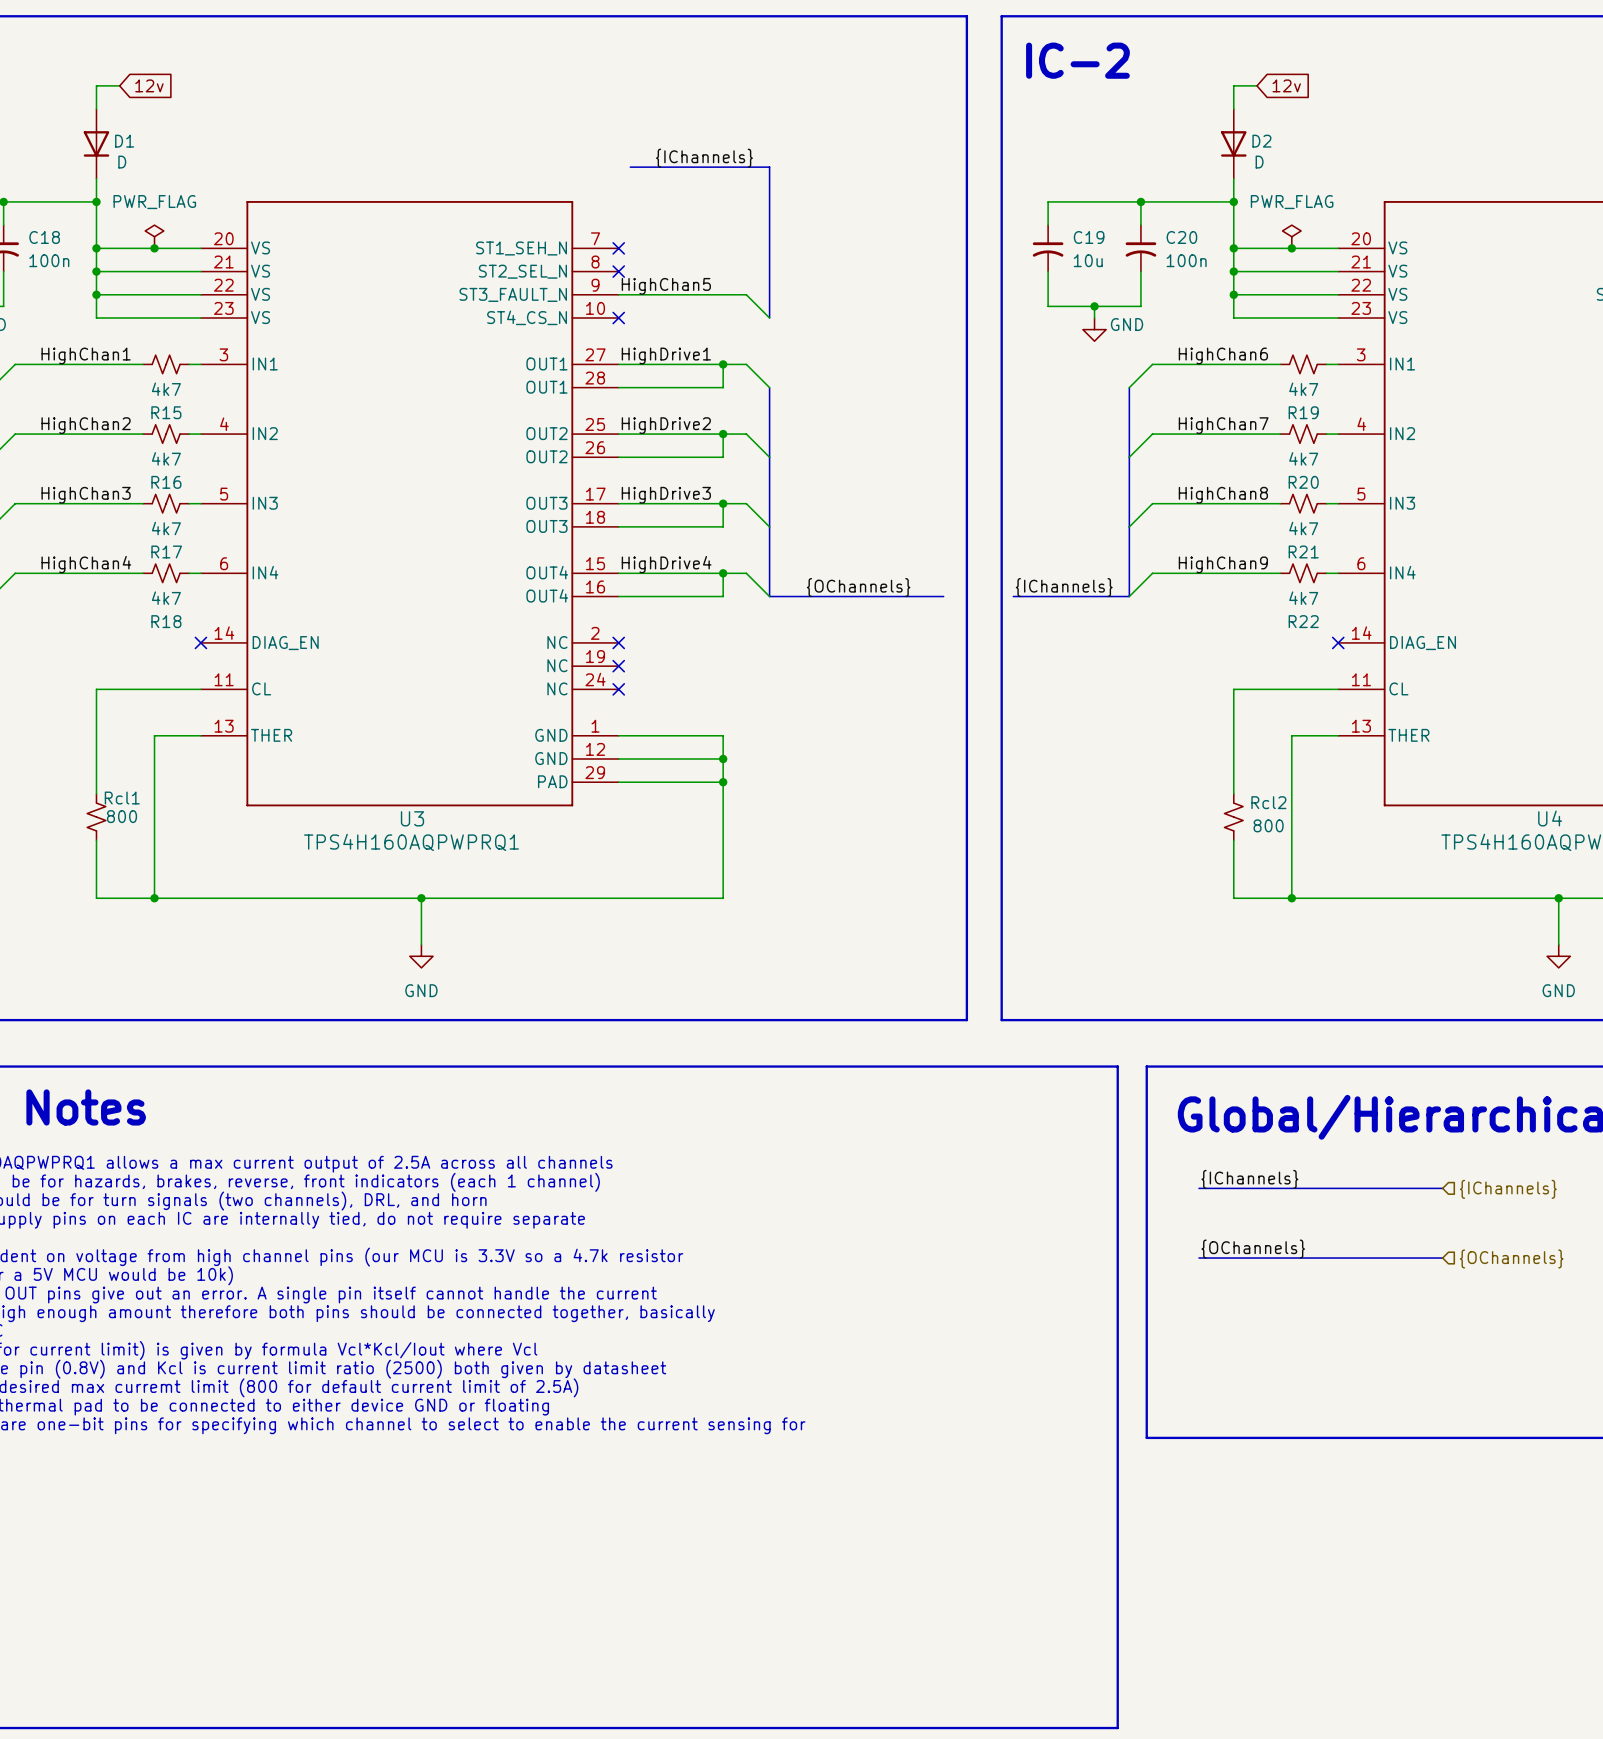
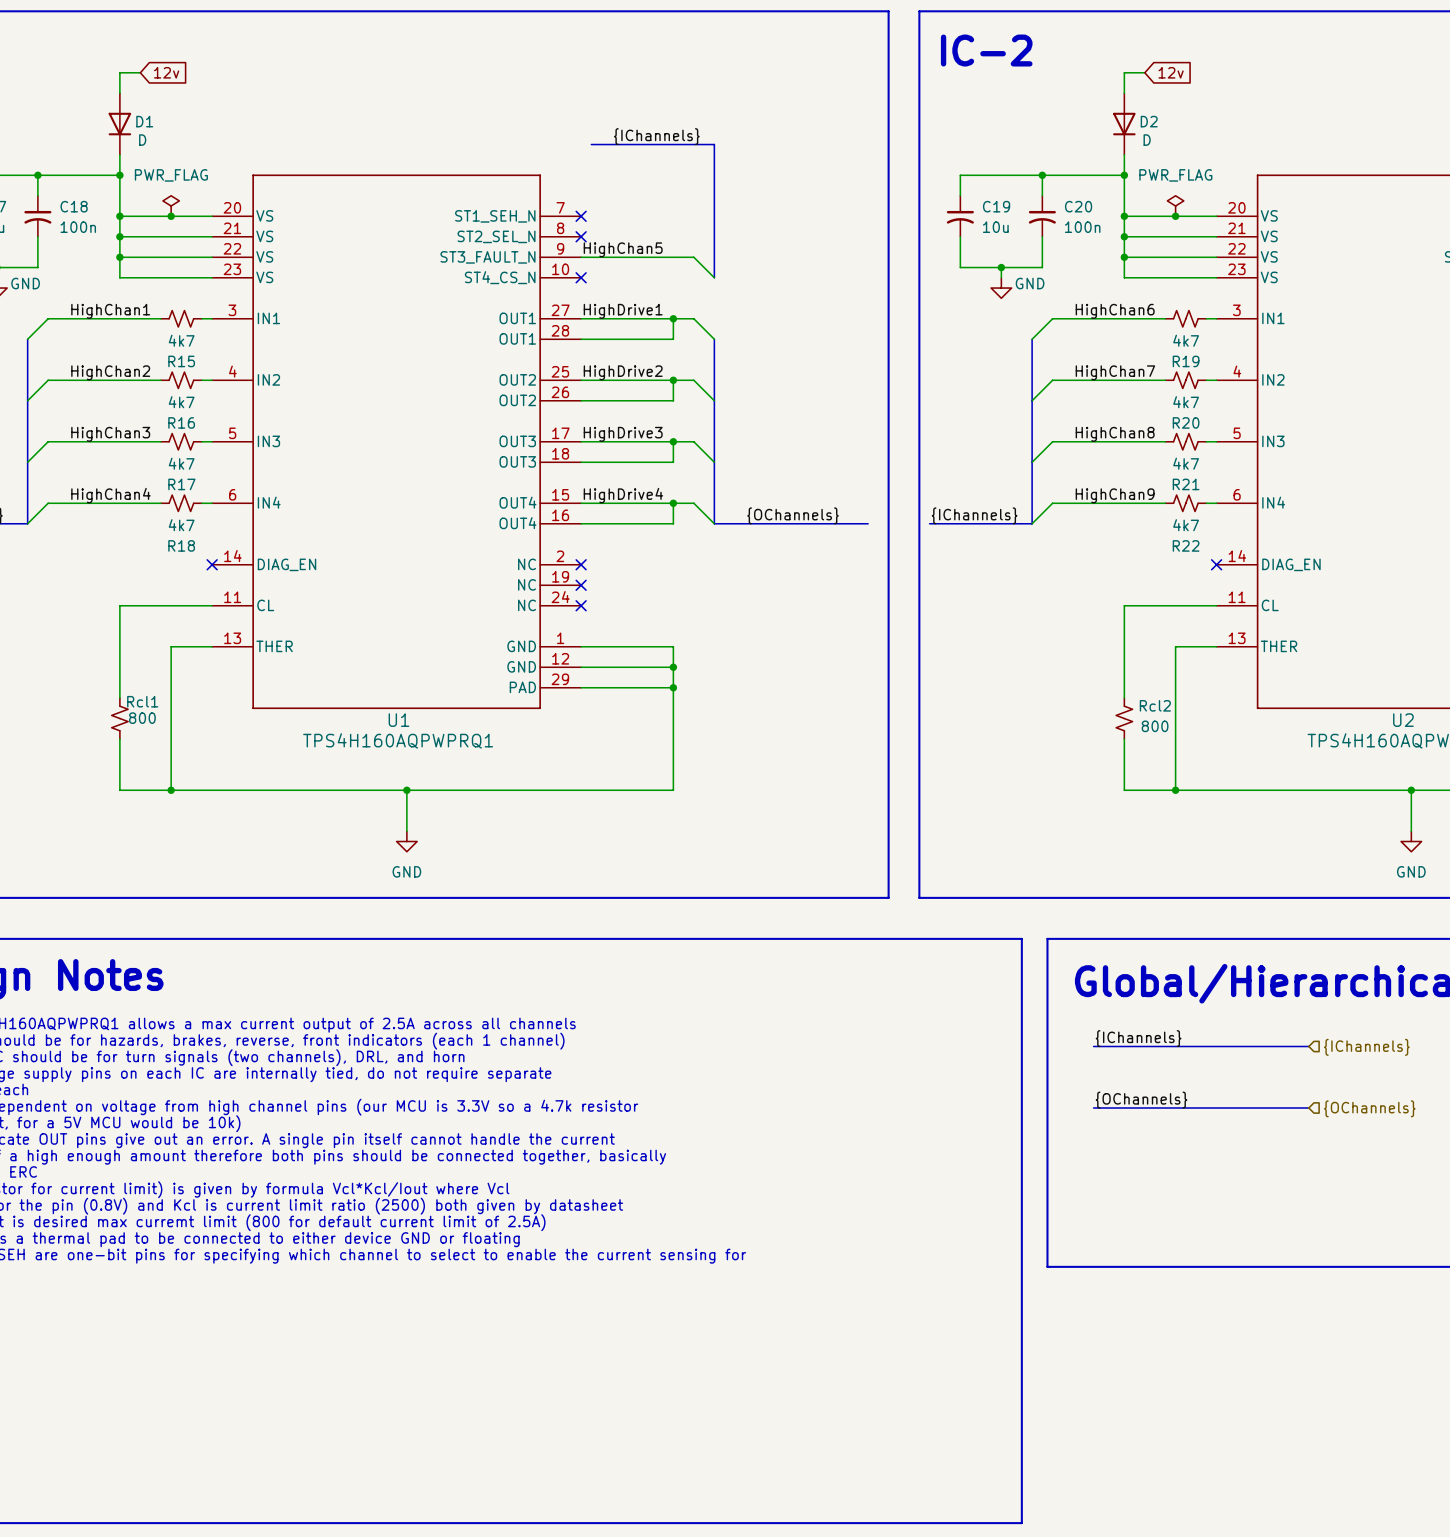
U3 name: U3 (412, 818) -> U1 (398, 720)
U4 name: U4 (1550, 818) -> U2 (1403, 720)

